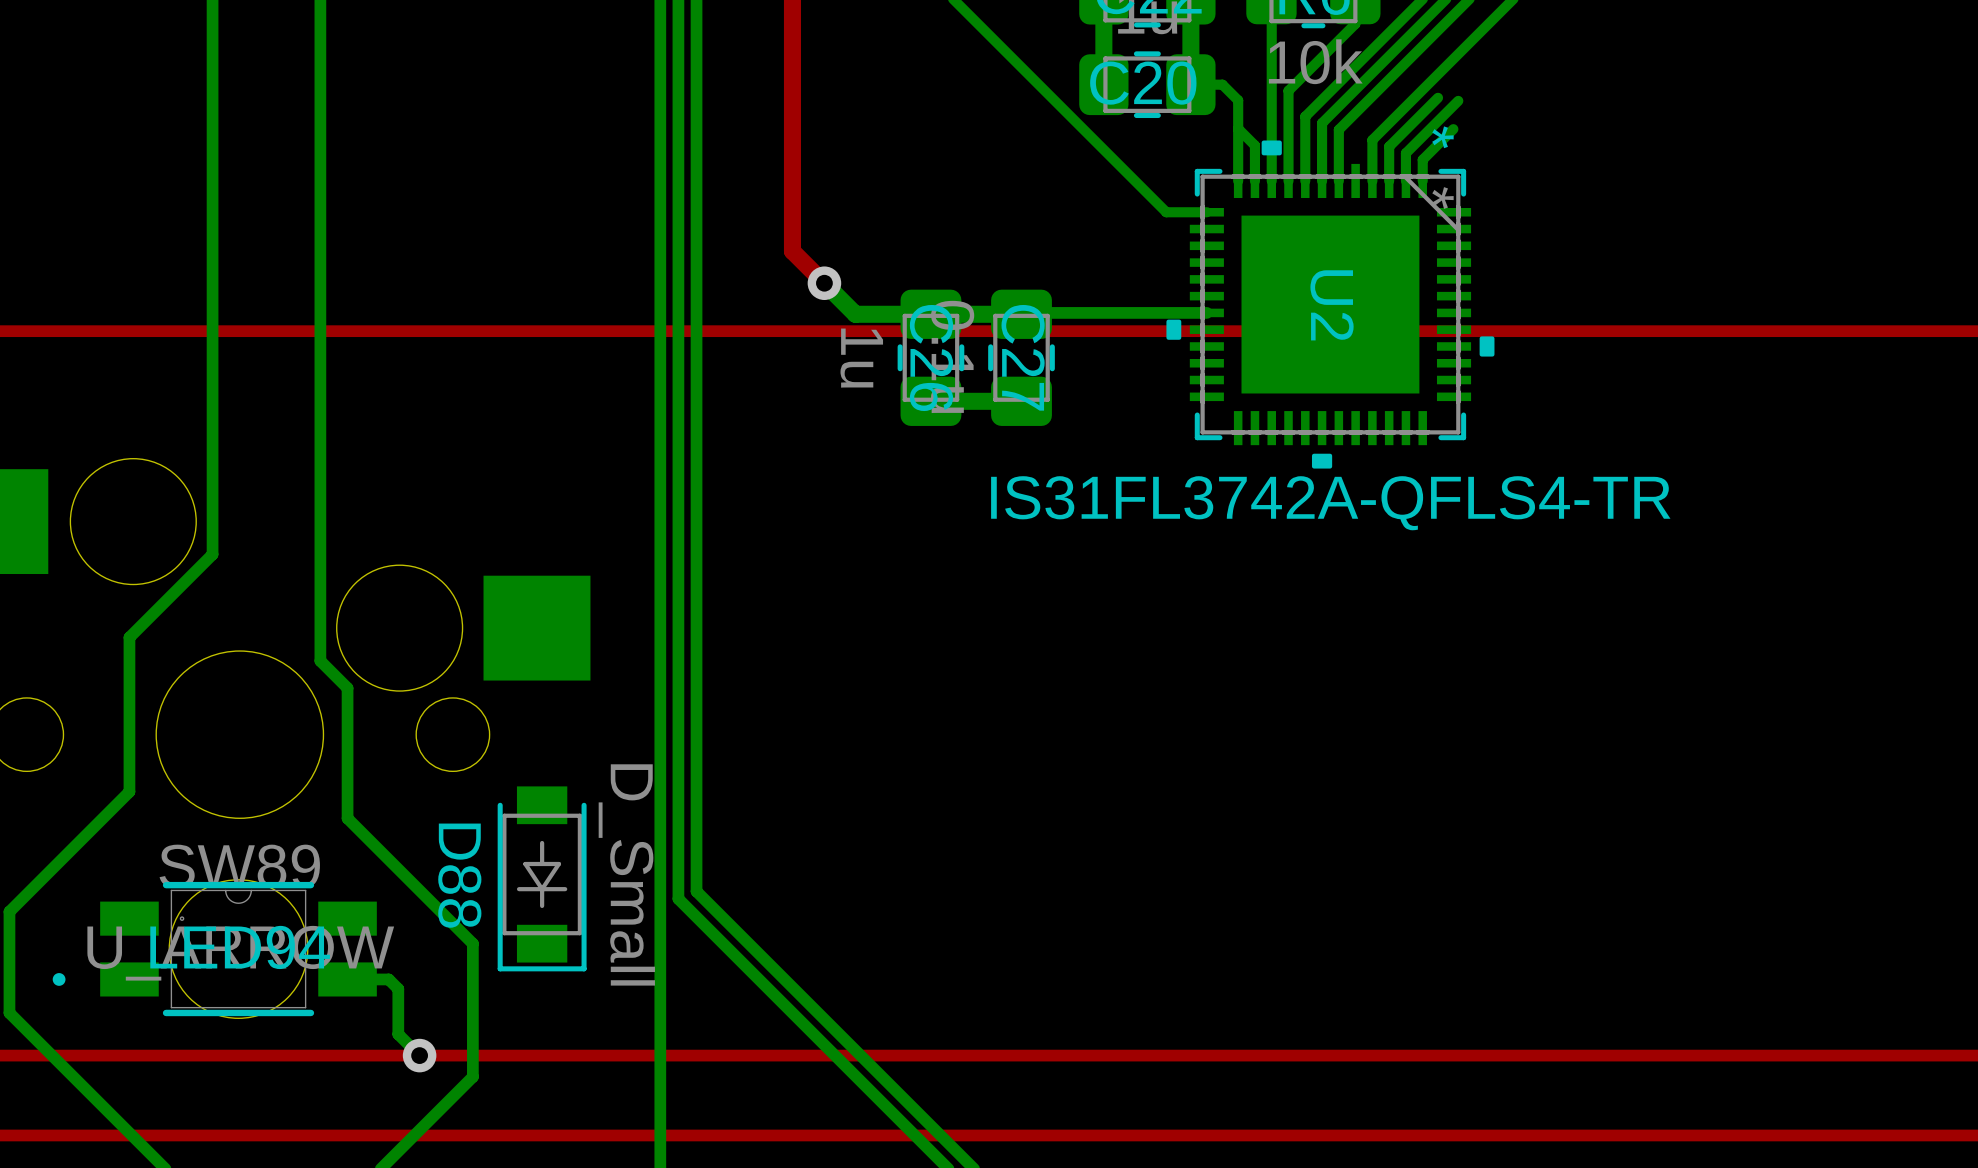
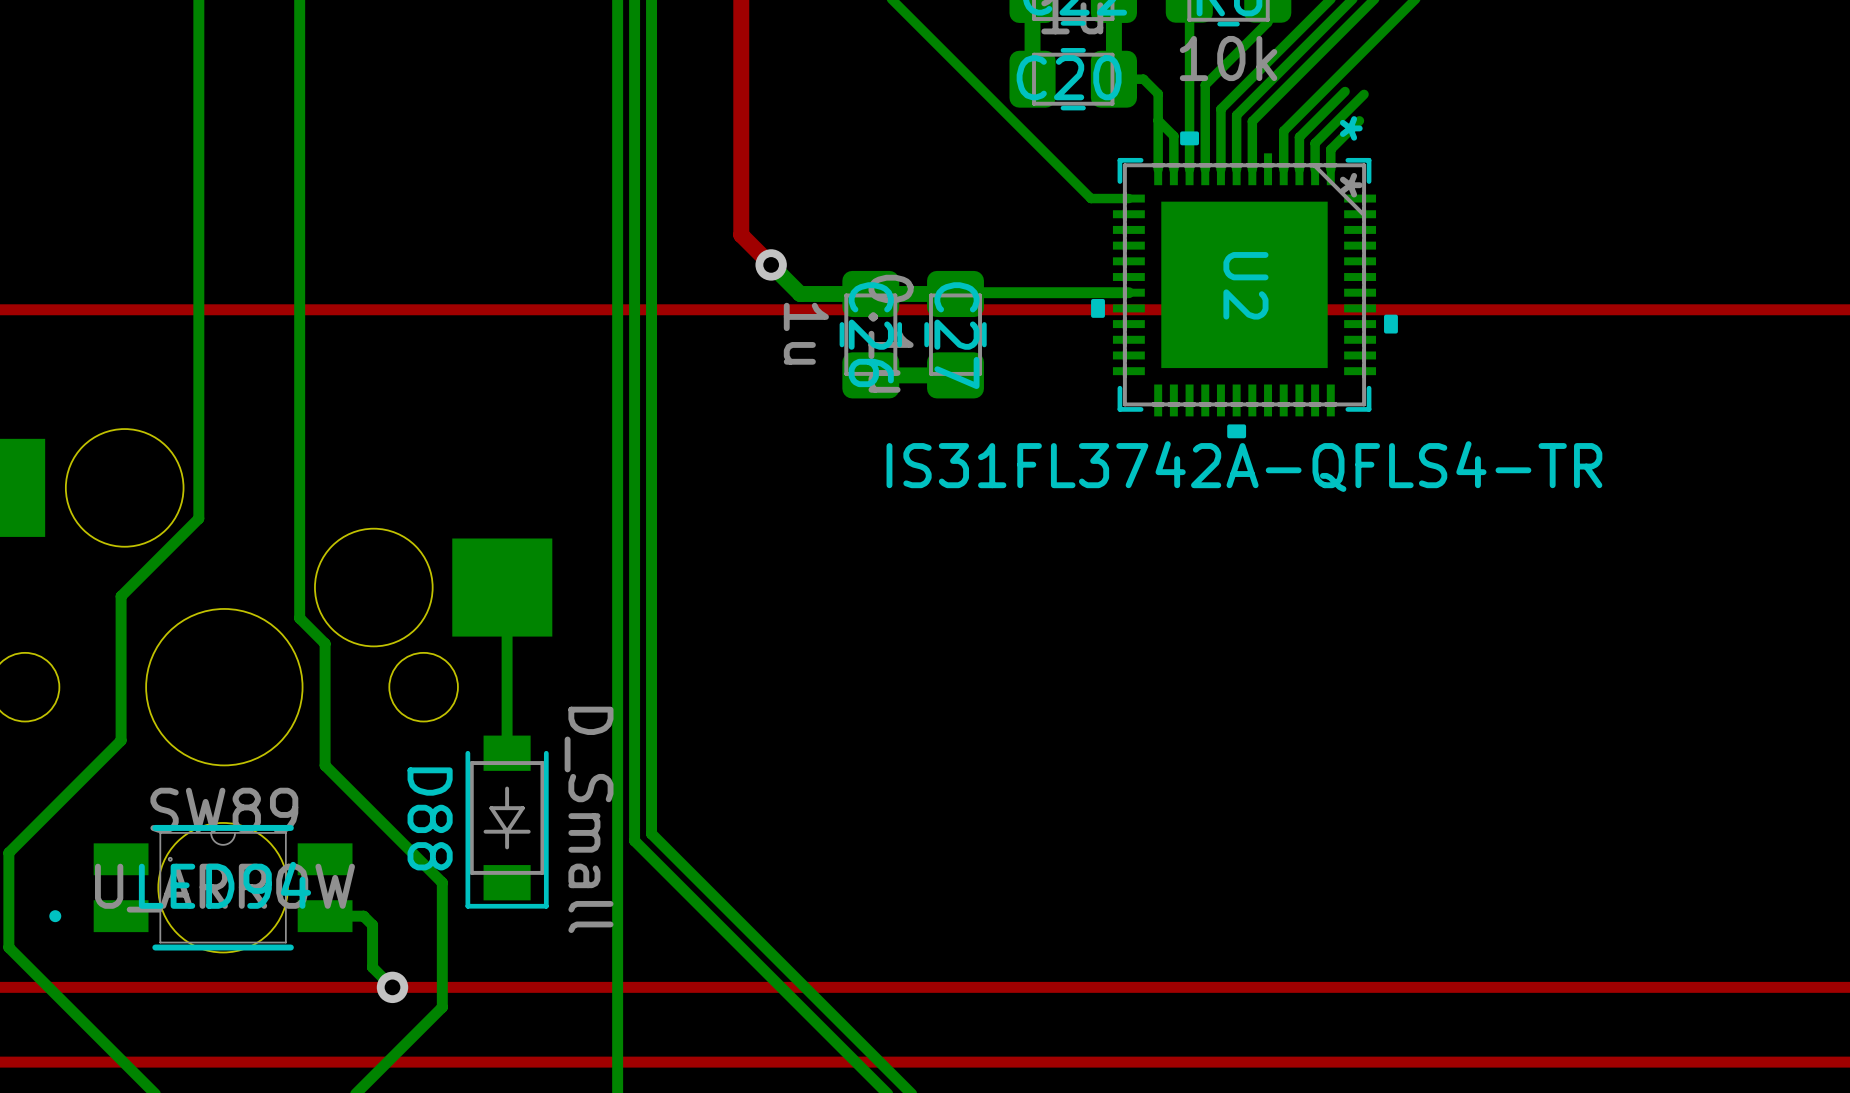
bottom track: none -> (502, 587) (507, 592) (507, 753)

